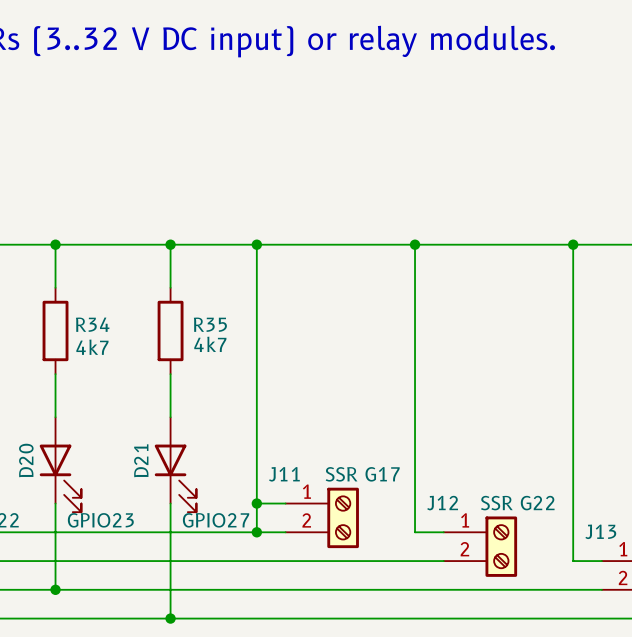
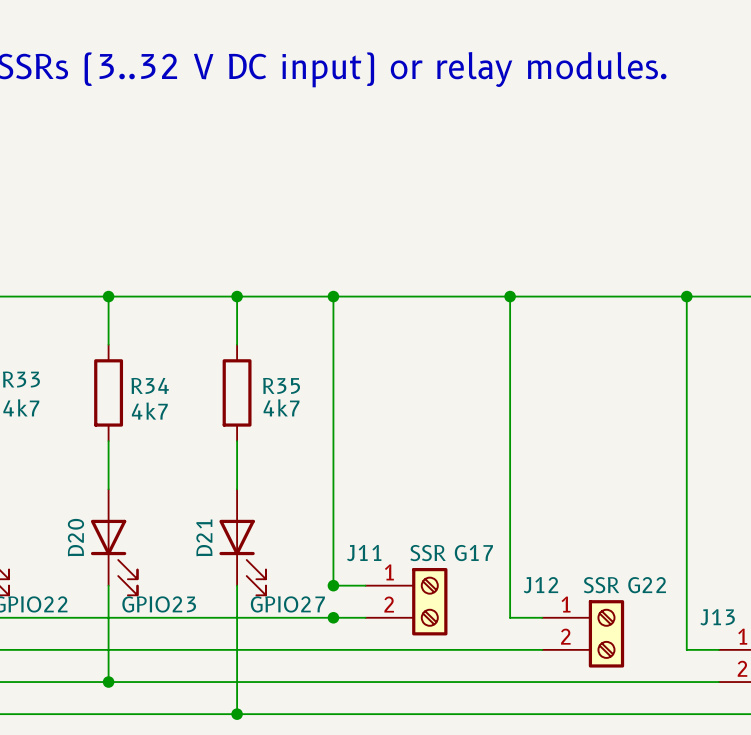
wire: (256, 503) (256, 532) -> none

